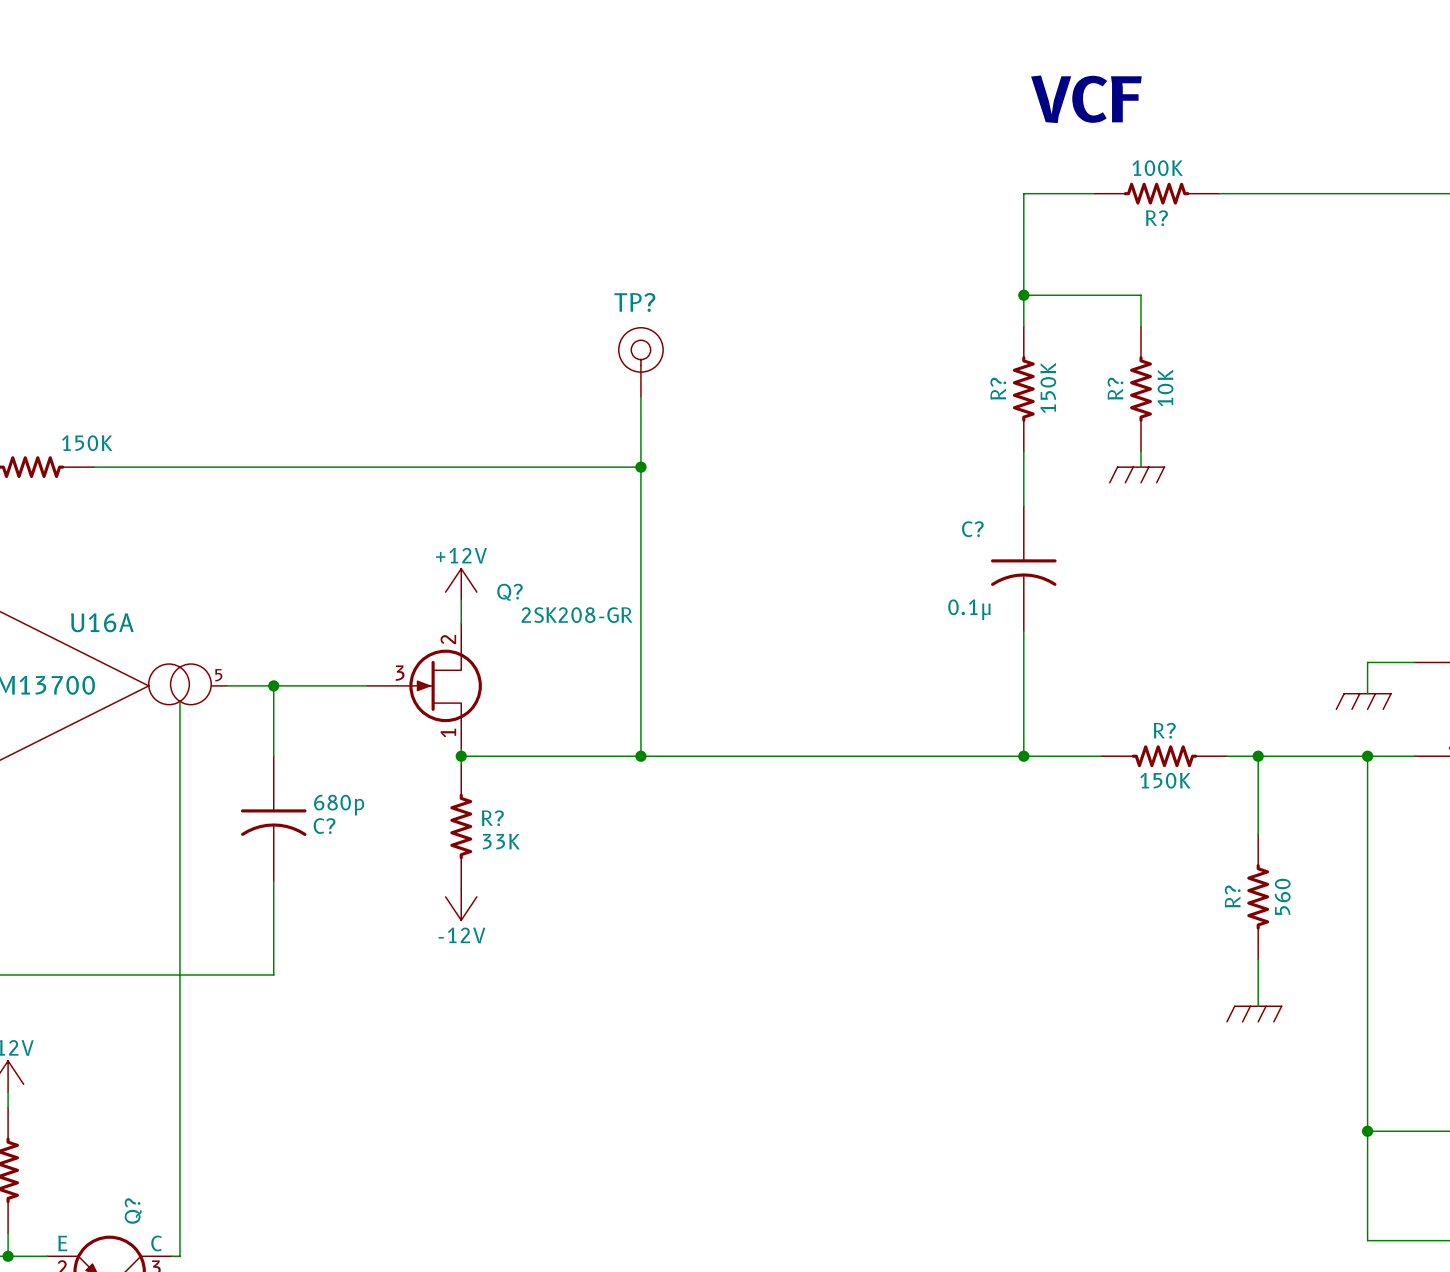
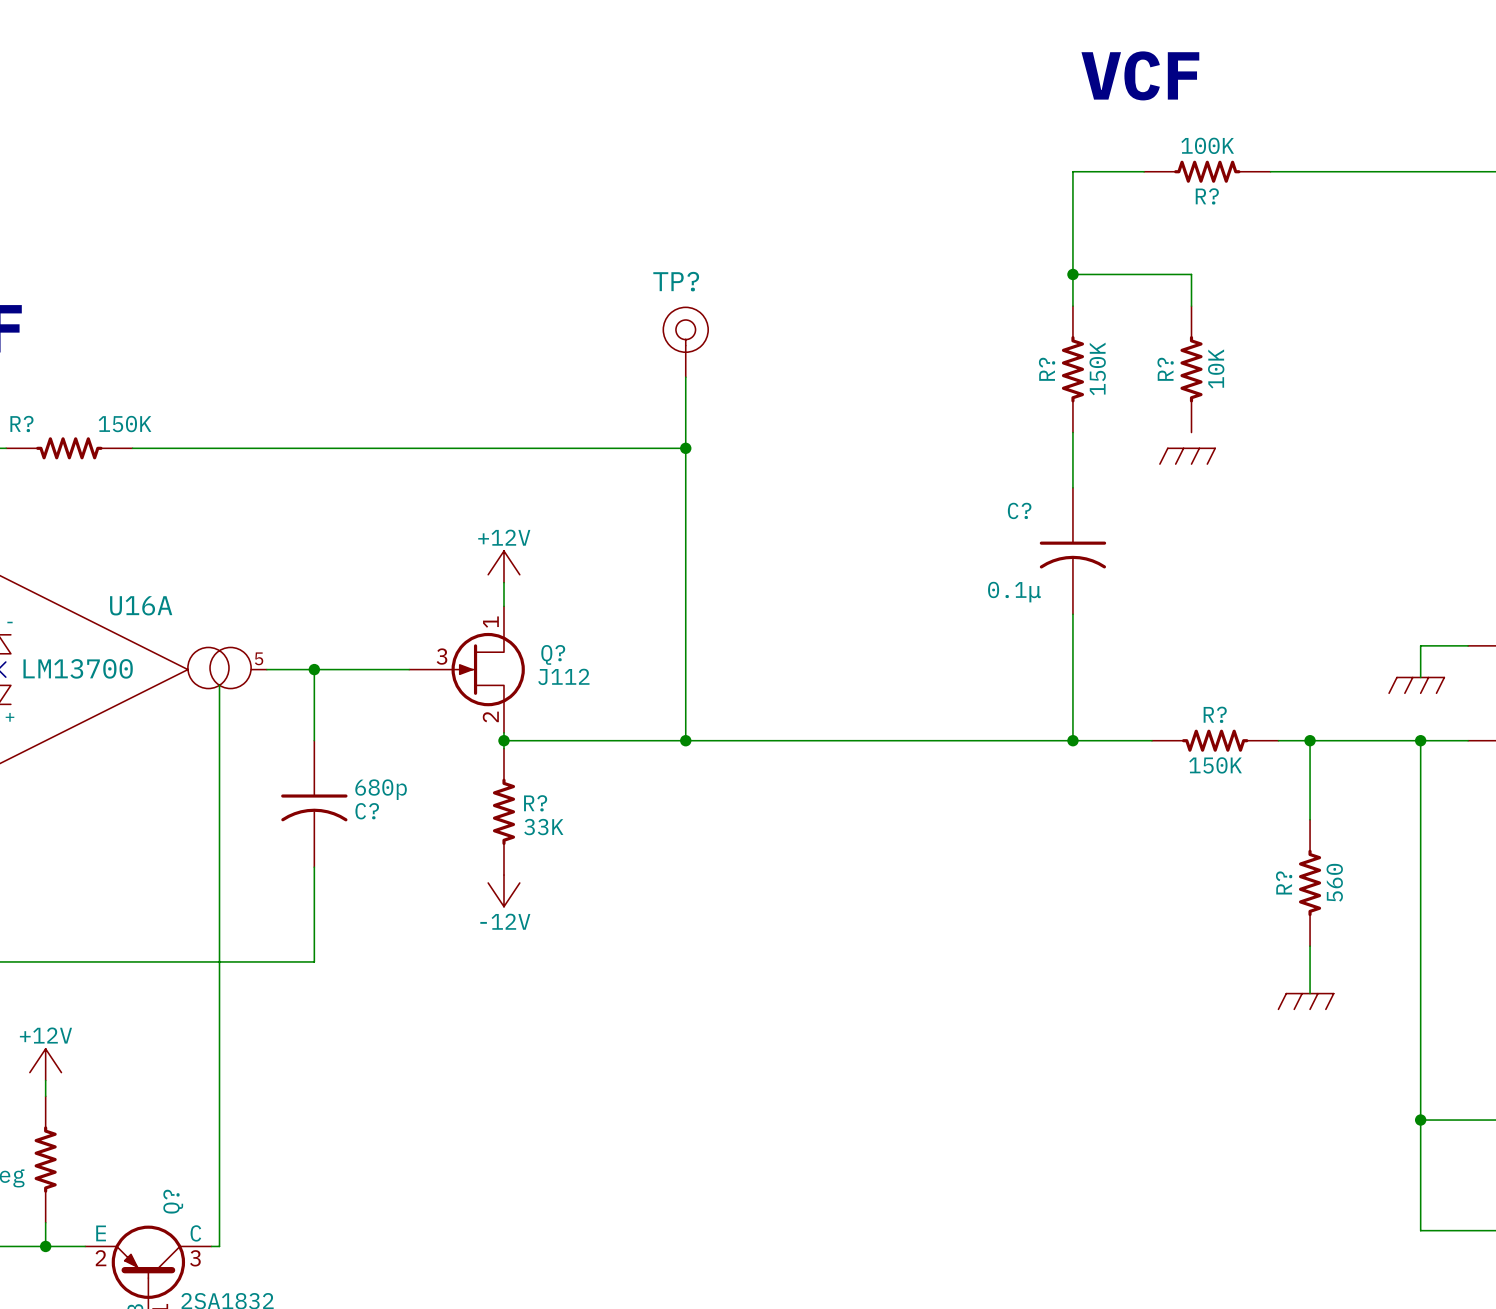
wire: (1141, 451) (1141, 467) -> none
Q? name position: Q? (510, 592) -> Q? (553, 654)
Q? value: 2SK208-GR (577, 615) -> J112 (563, 676)
Q? flip: as is (445, 685) -> up-down (488, 669)

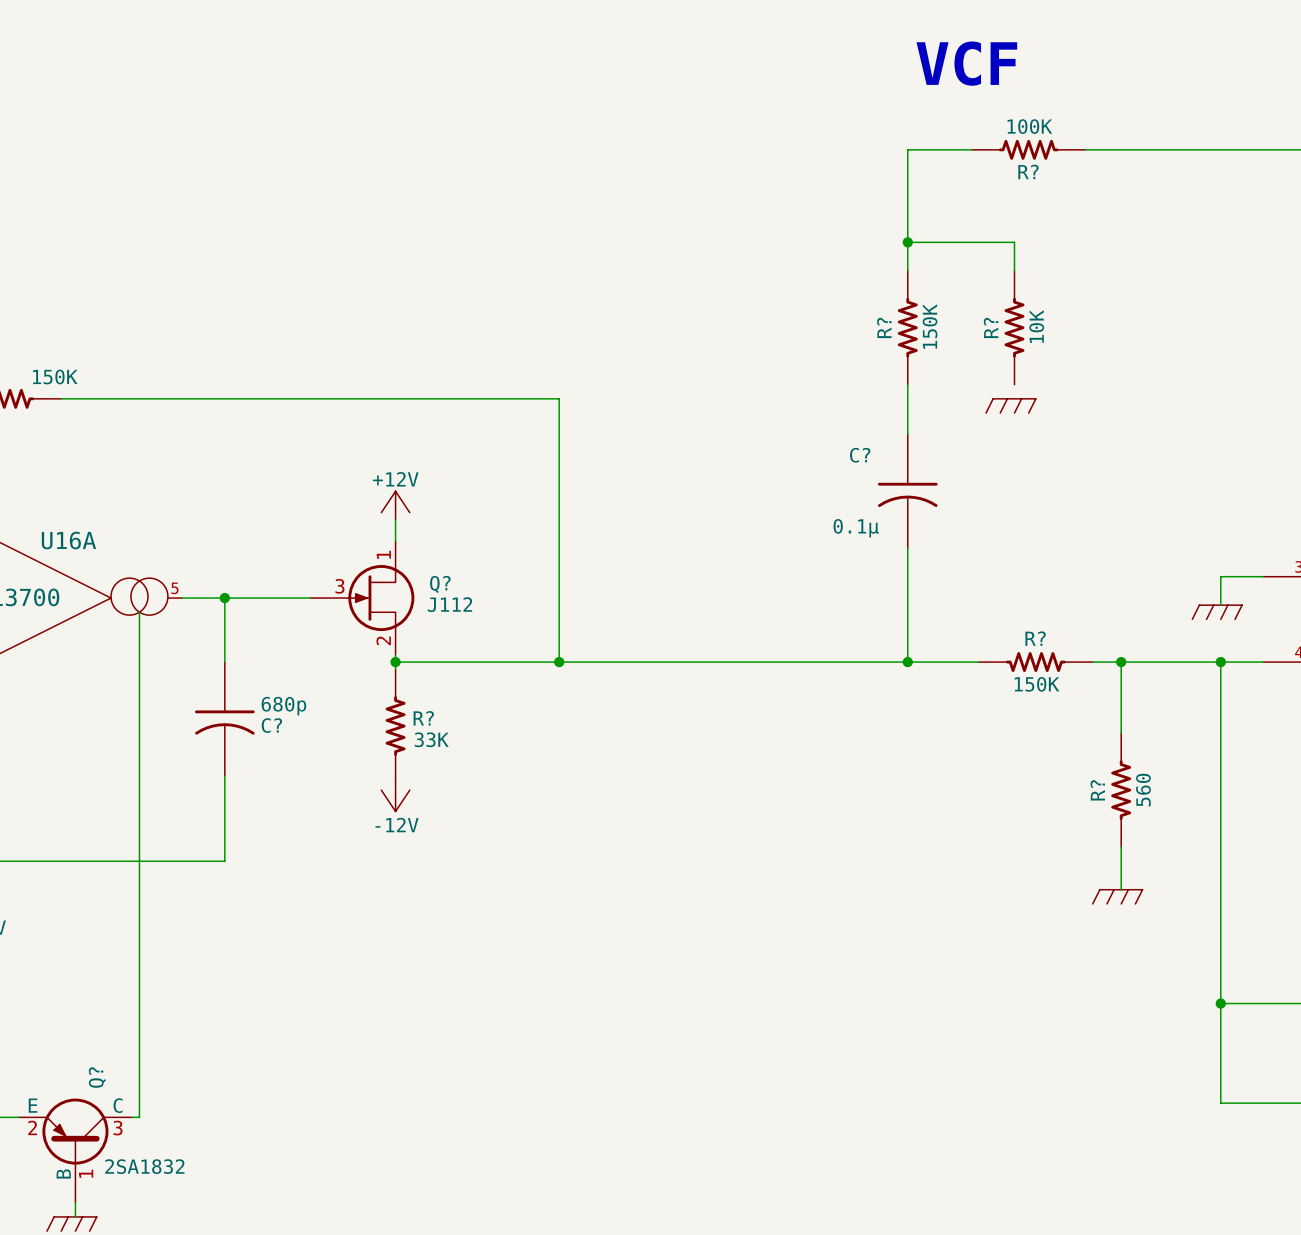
TP?: (685, 342) -> none
wire: (685, 377) (685, 448) -> none
junction: (685, 448) -> none

